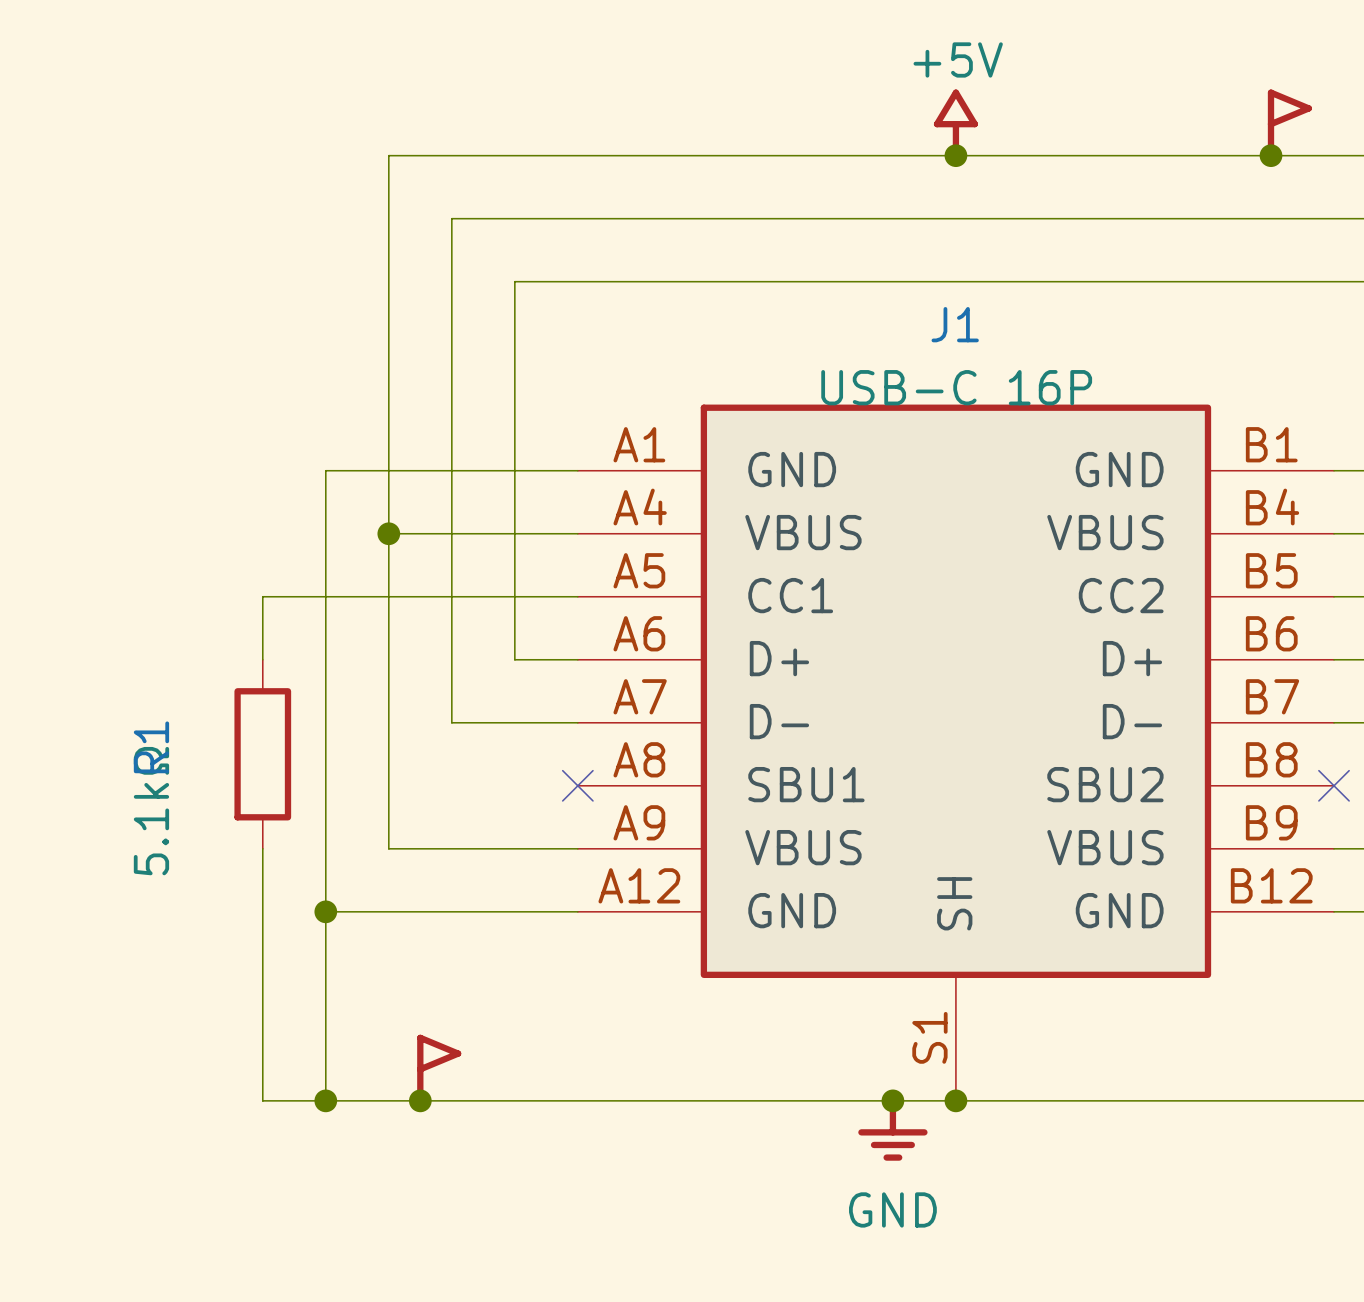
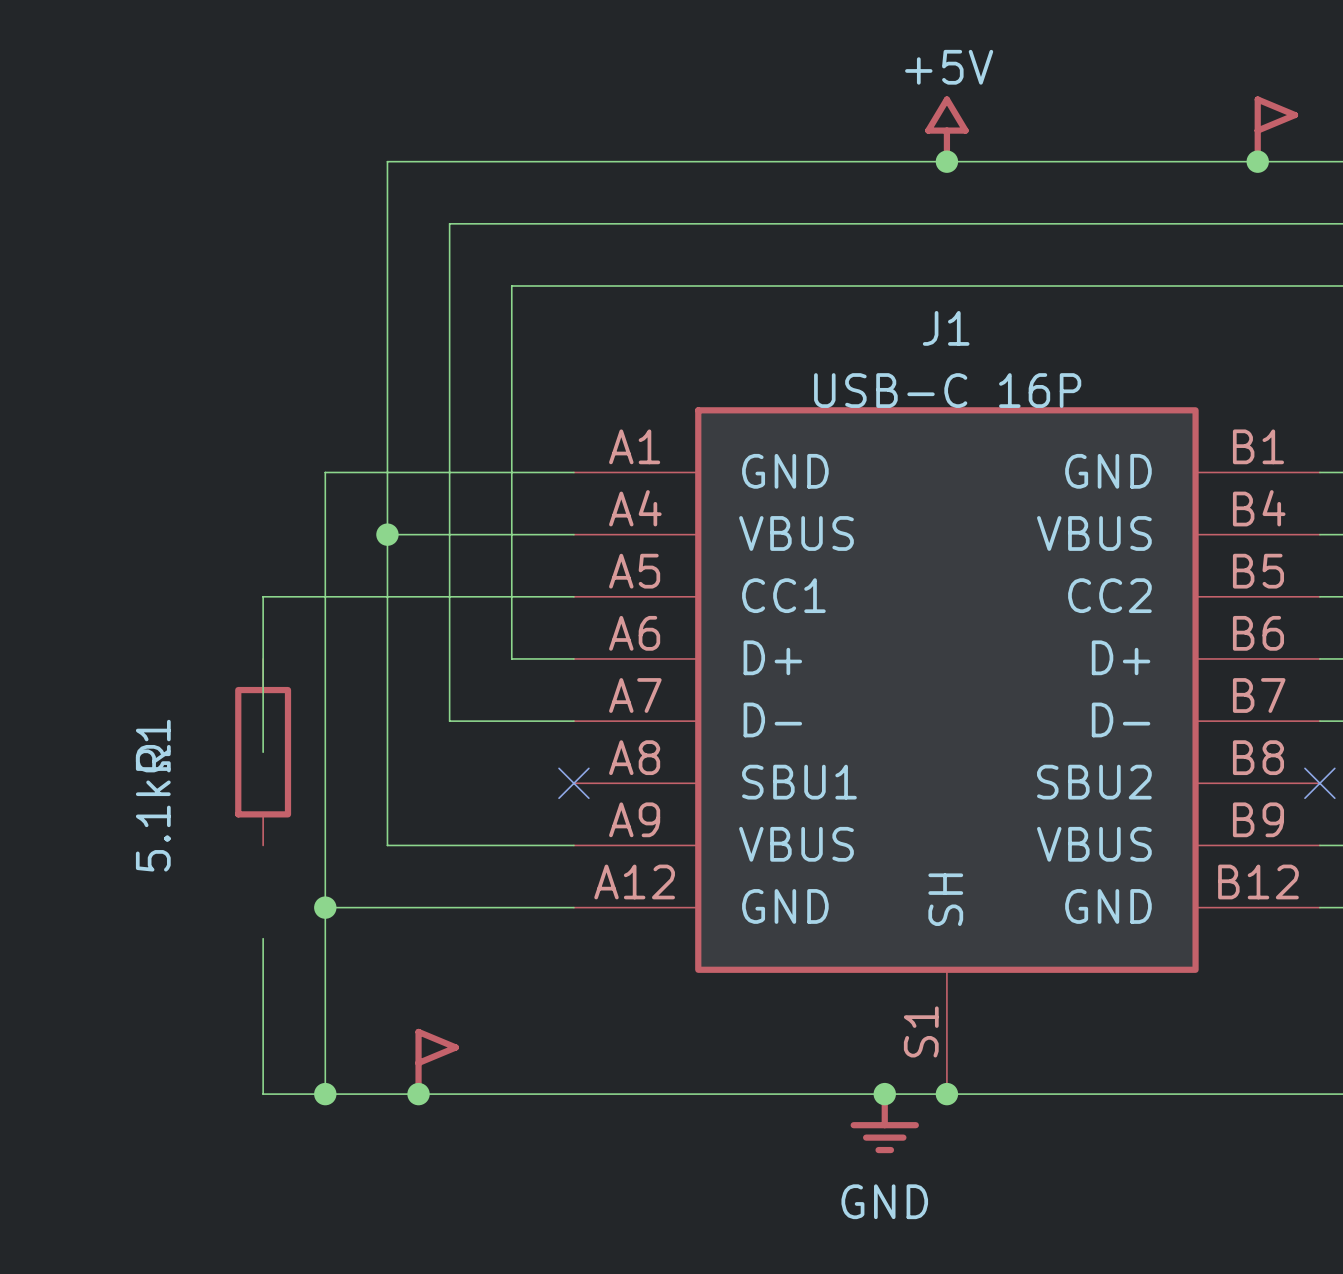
wire: (262, 848) (262, 943) -> (263, 658) (263, 752)

